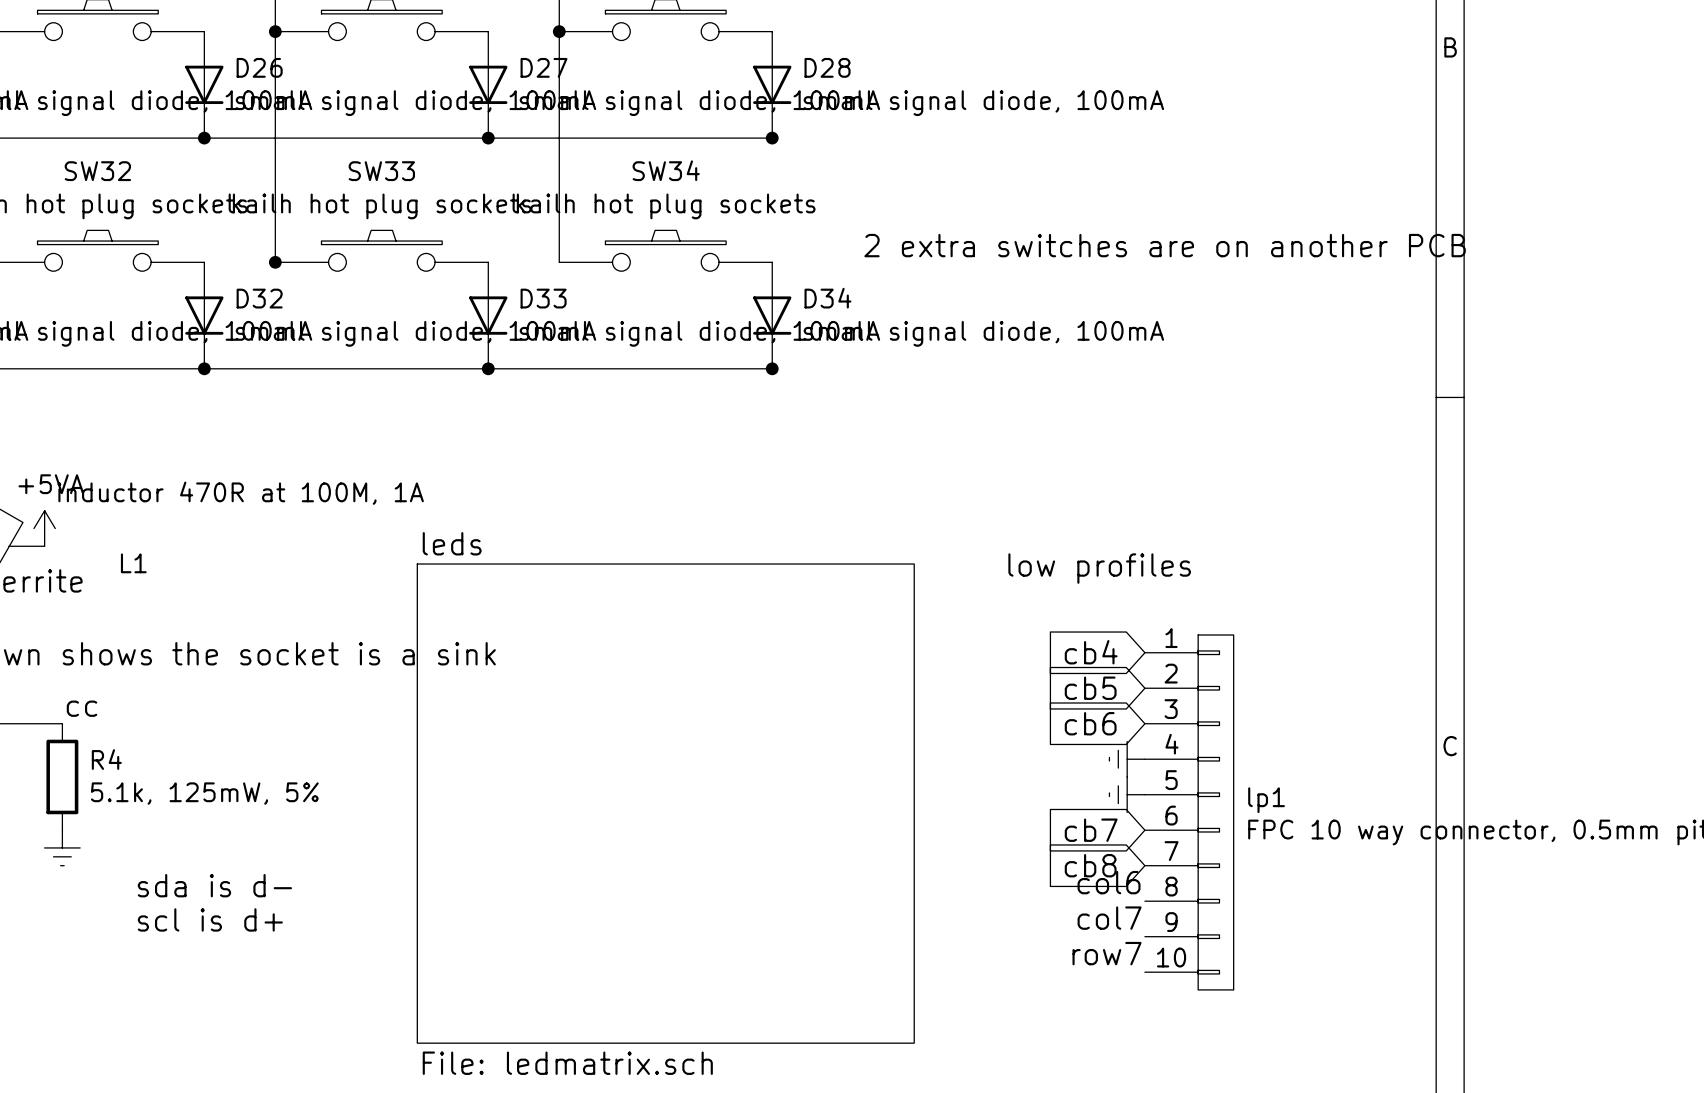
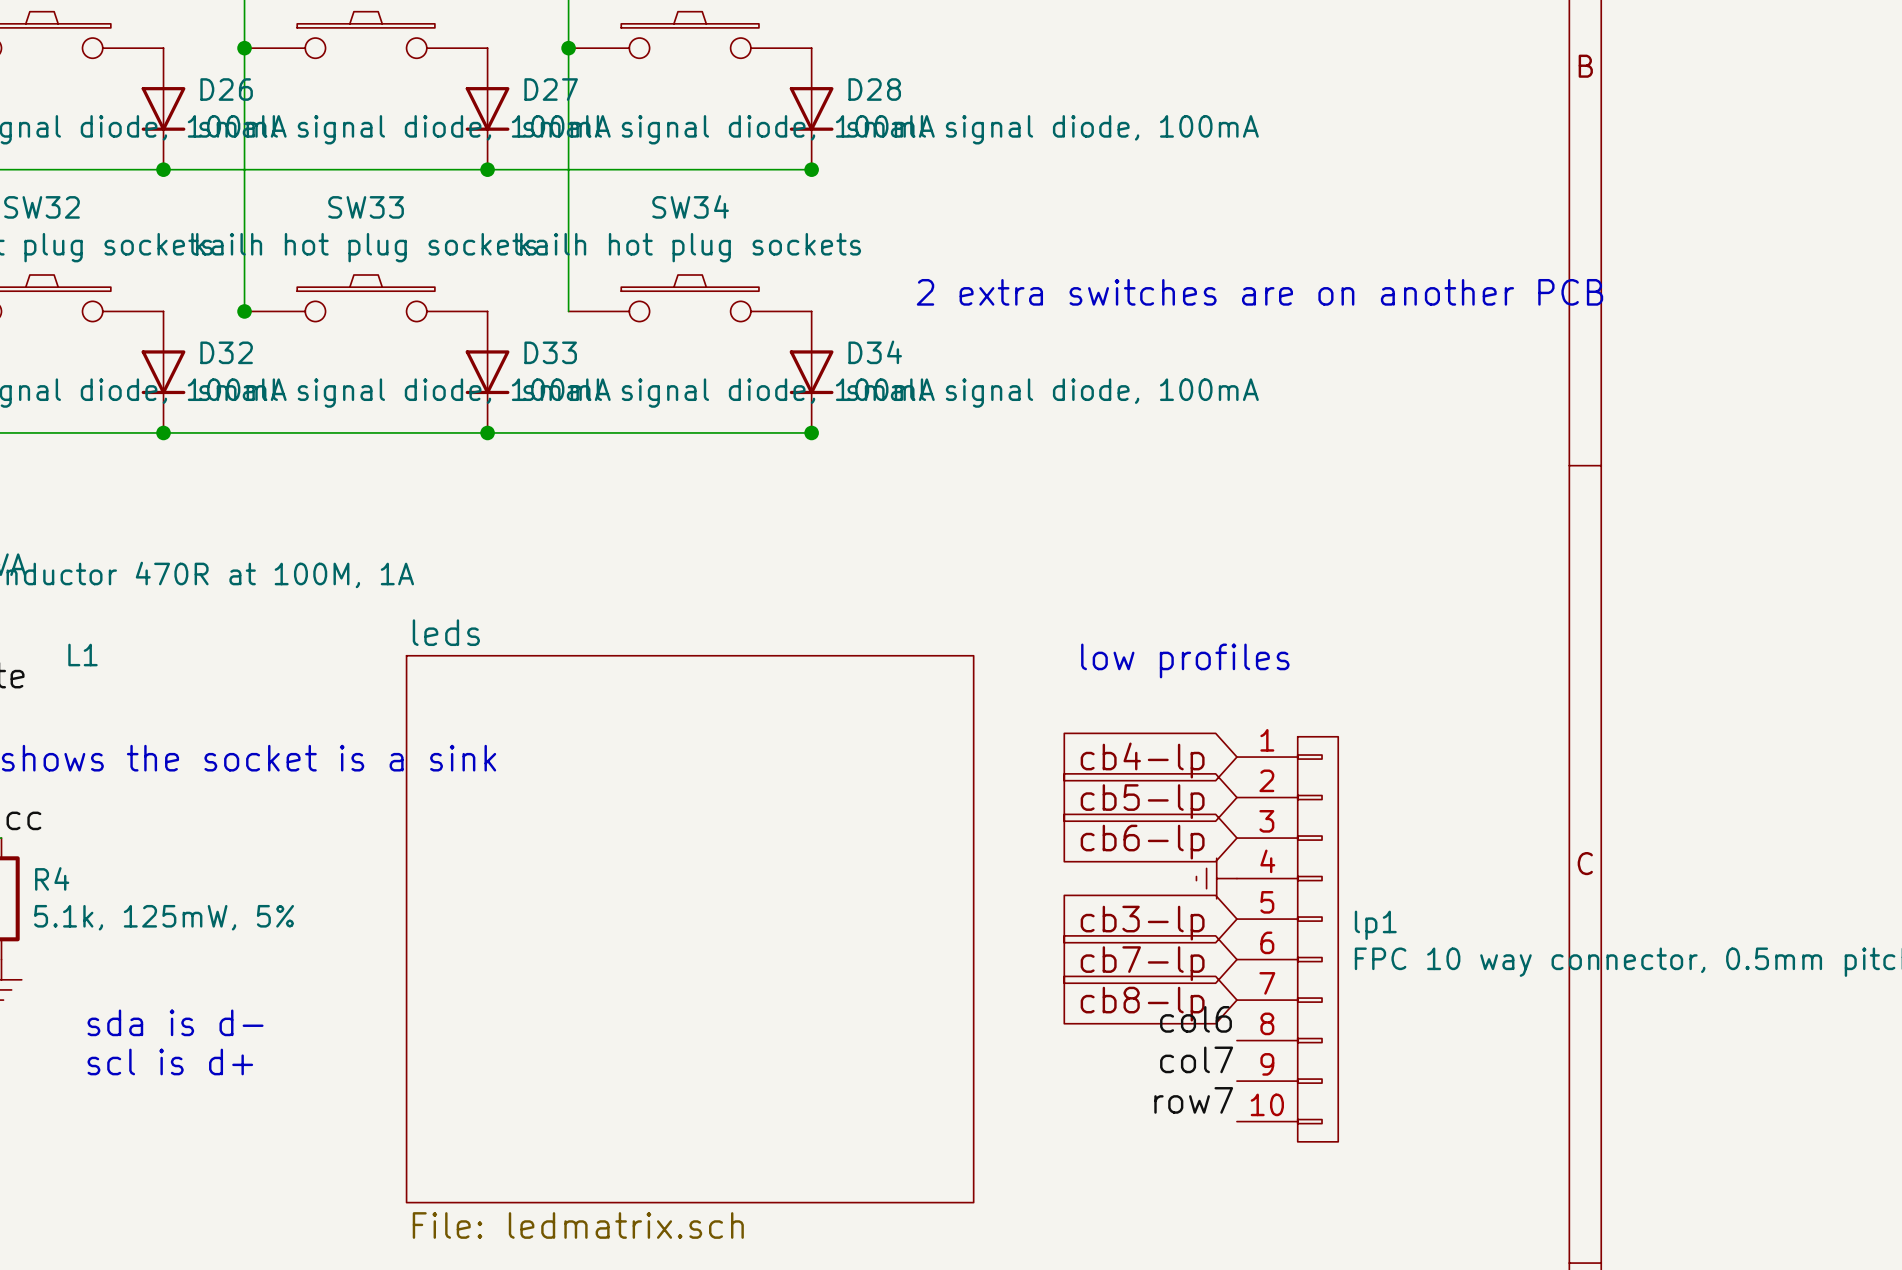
global label: cb4 (1091, 652) -> cb4-lp (1142, 760)
global label: cb5 (1090, 688) -> cb5-lp (1142, 801)
global label: cb6 (1090, 723) -> cb6-lp (1142, 842)
power symbol: (1127, 794) -> none
global label: none -> cb3-lp (1142, 923)
global label: cb7 (1091, 830) -> cb7-lp (1142, 963)
global label: cb8 (1090, 865) -> cb8-lp (1142, 1004)

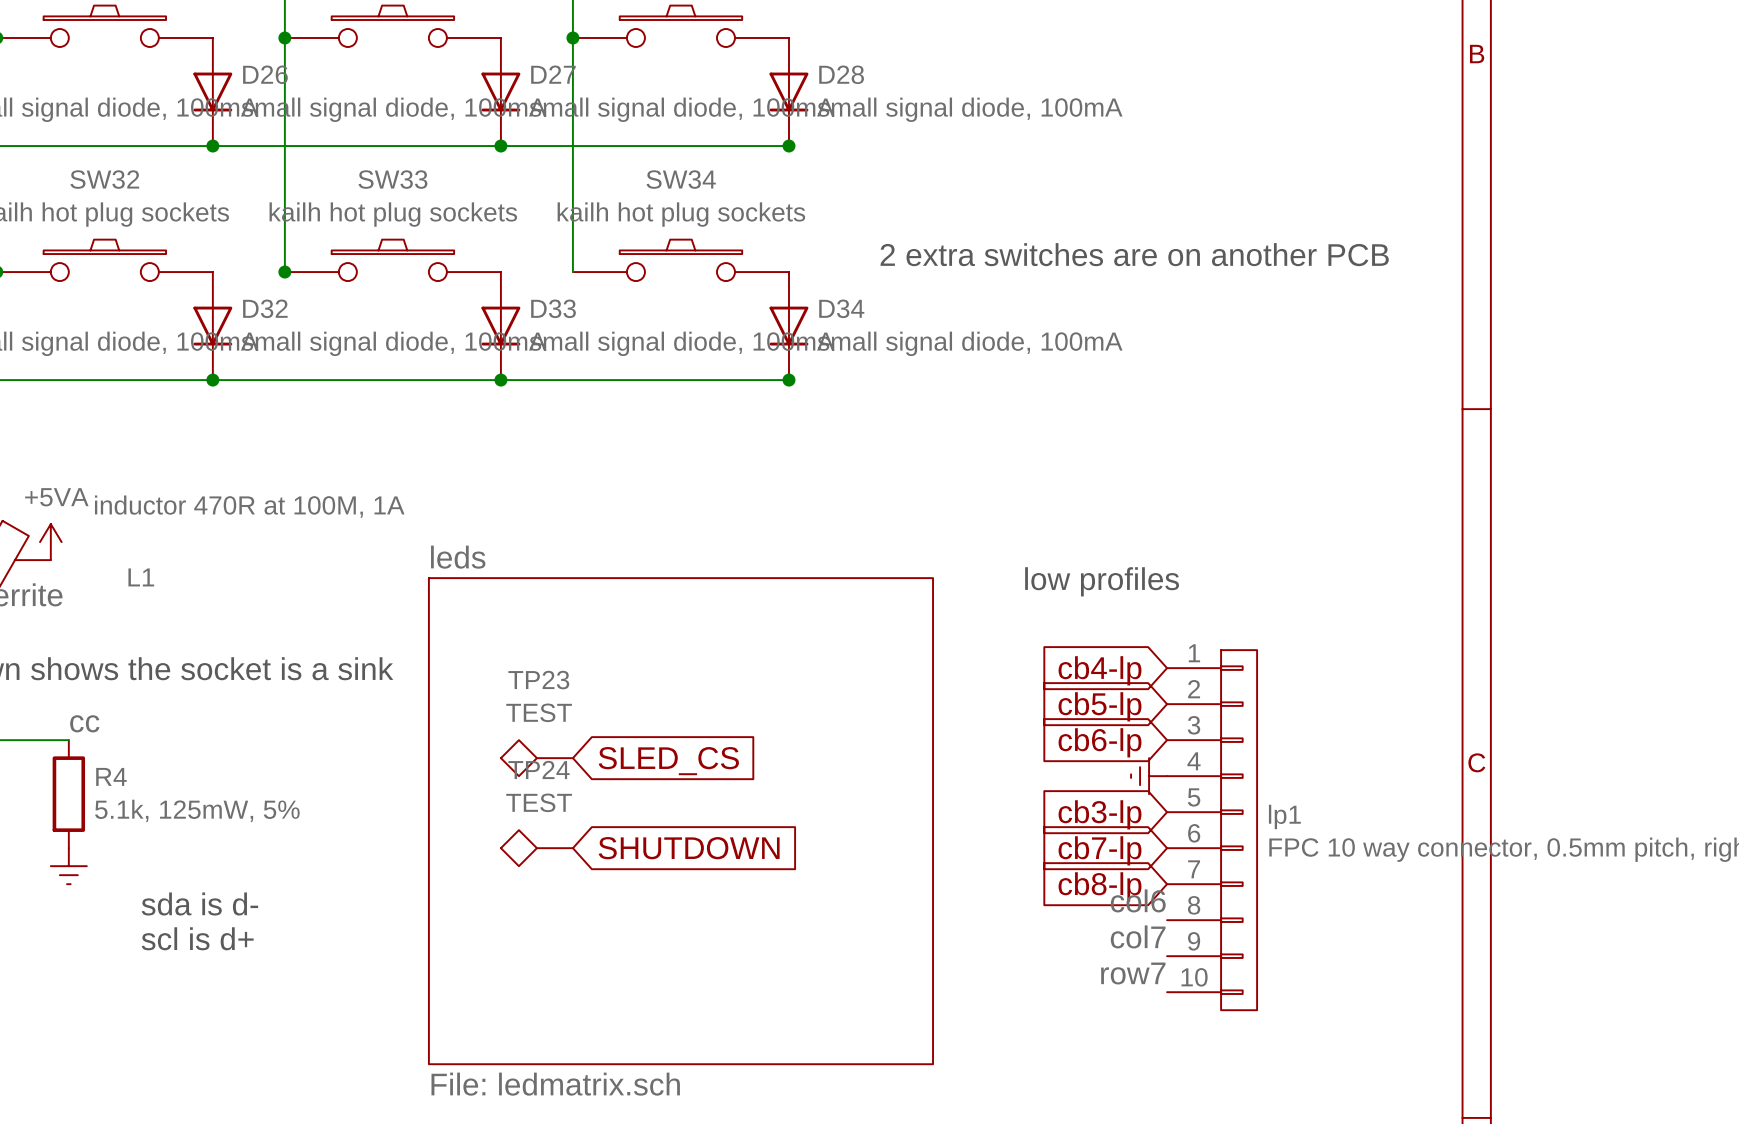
TP23: none -> TEST (536, 758)
global label: none -> SLED_CS (668, 761)
TP24: none -> TEST (536, 848)
global label: none -> SHUTDOWN (689, 848)

